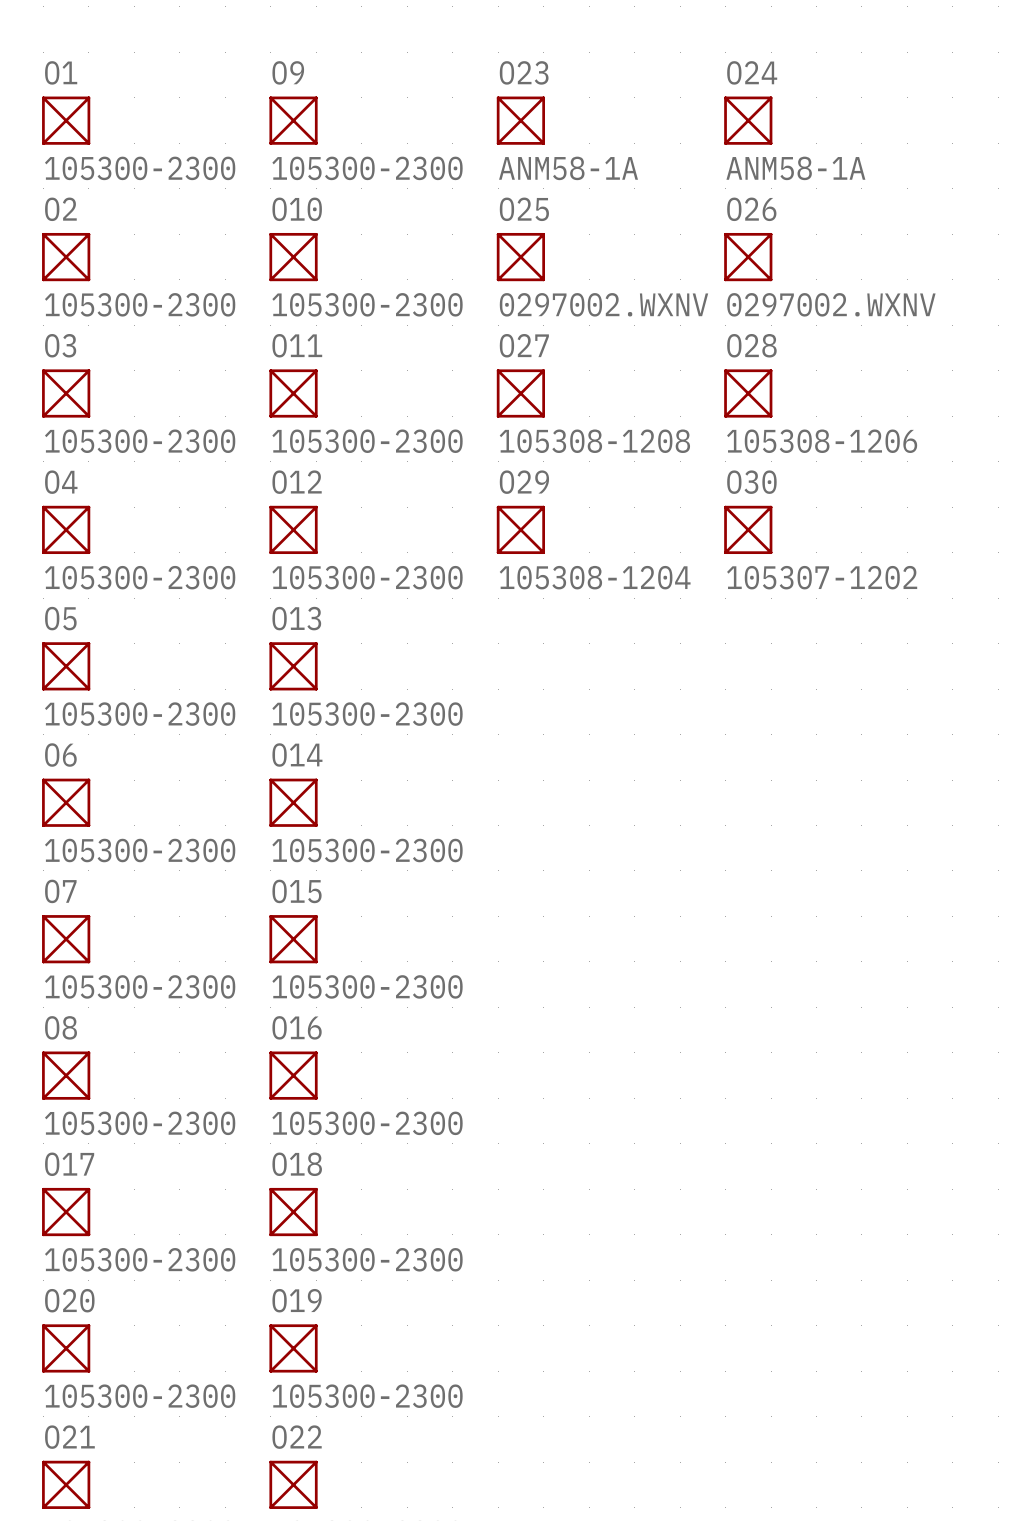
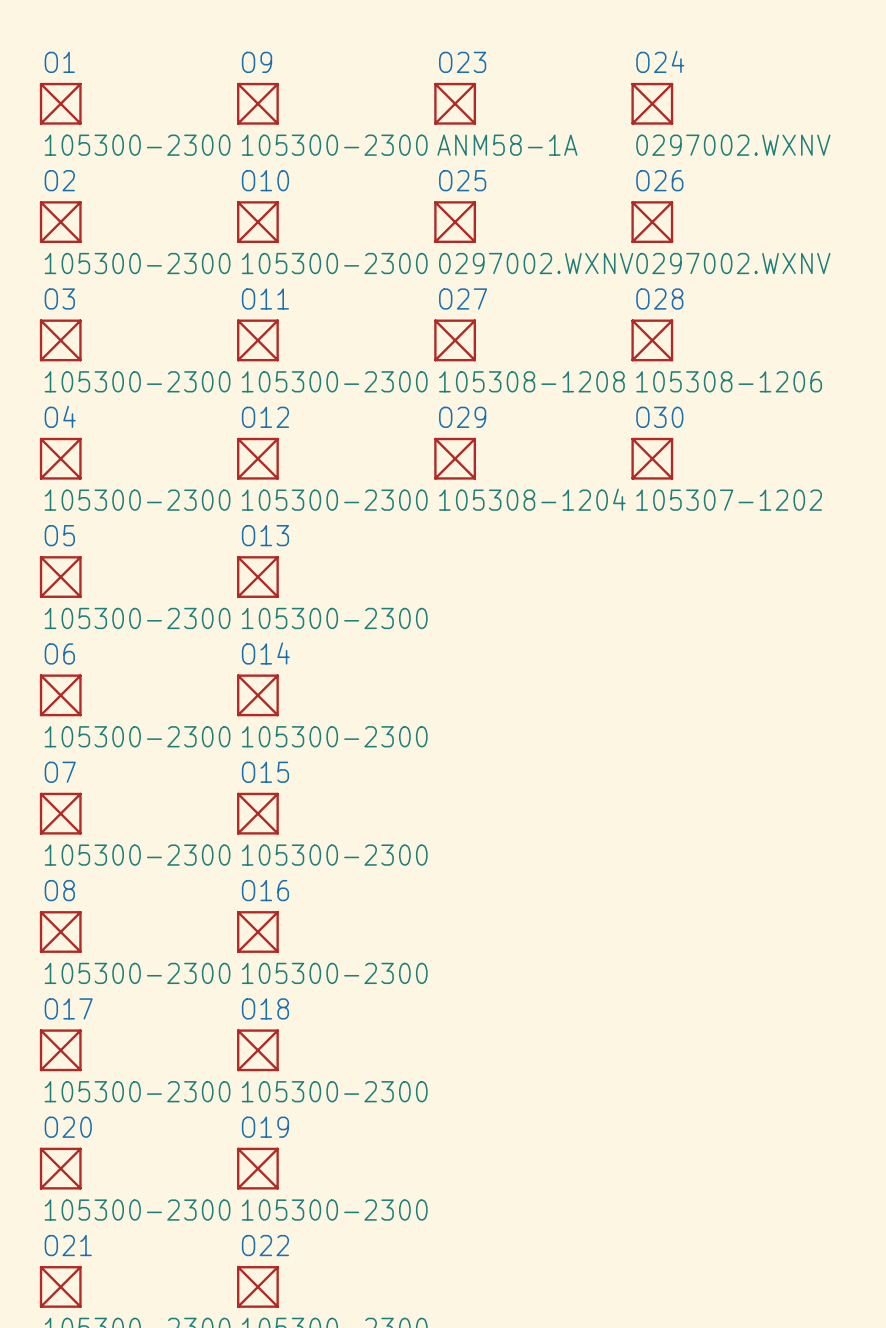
O24 text: ANM58-1A (795, 168) -> 0297002.WXNV (733, 145)

